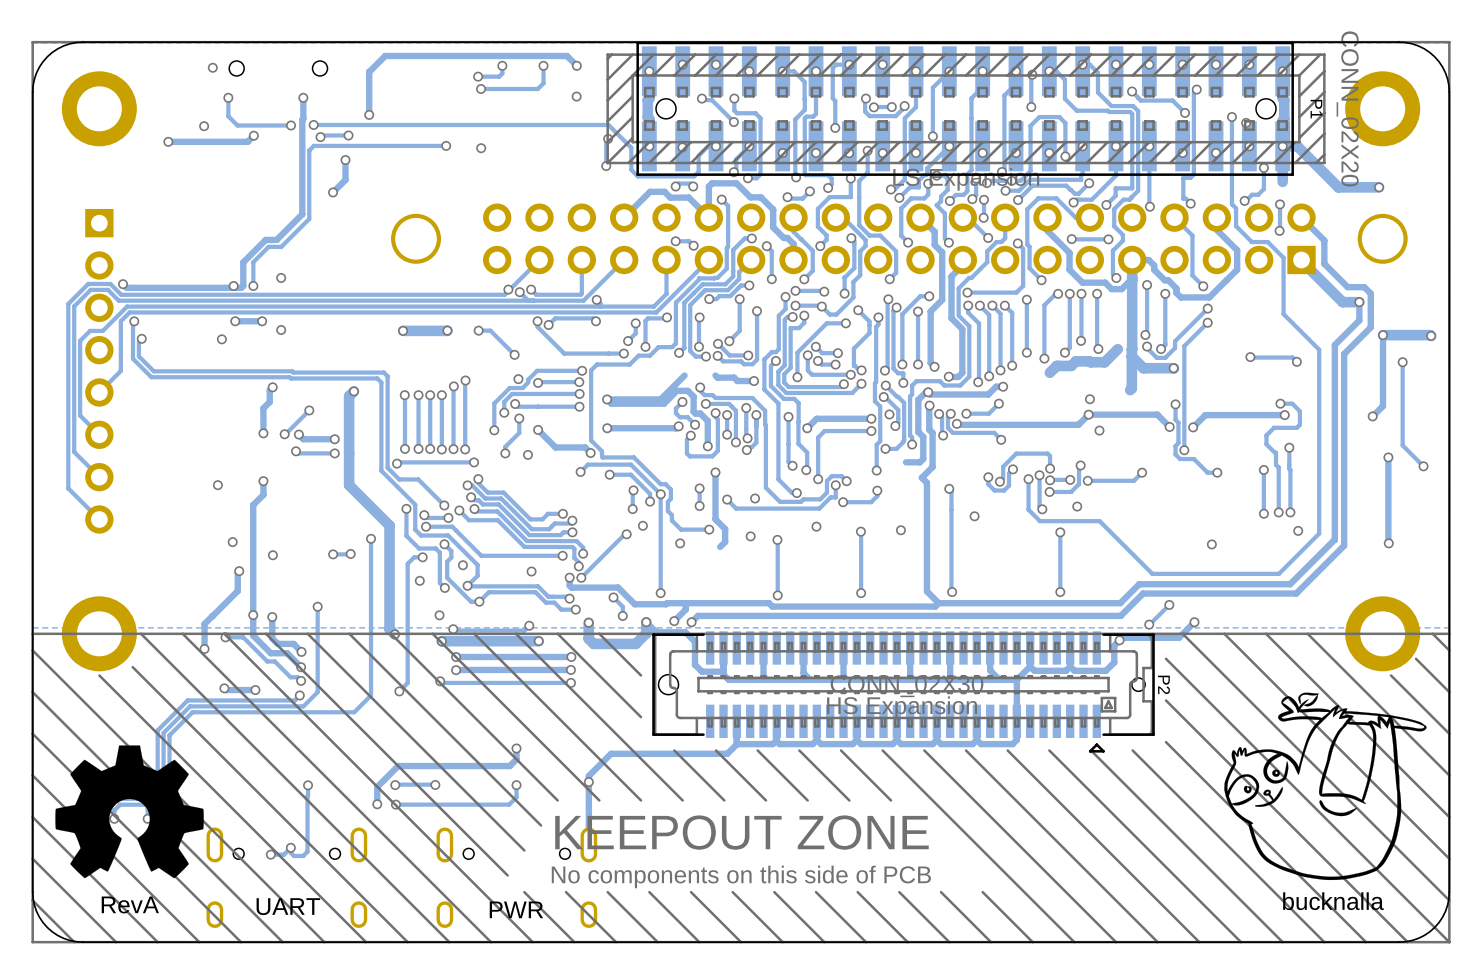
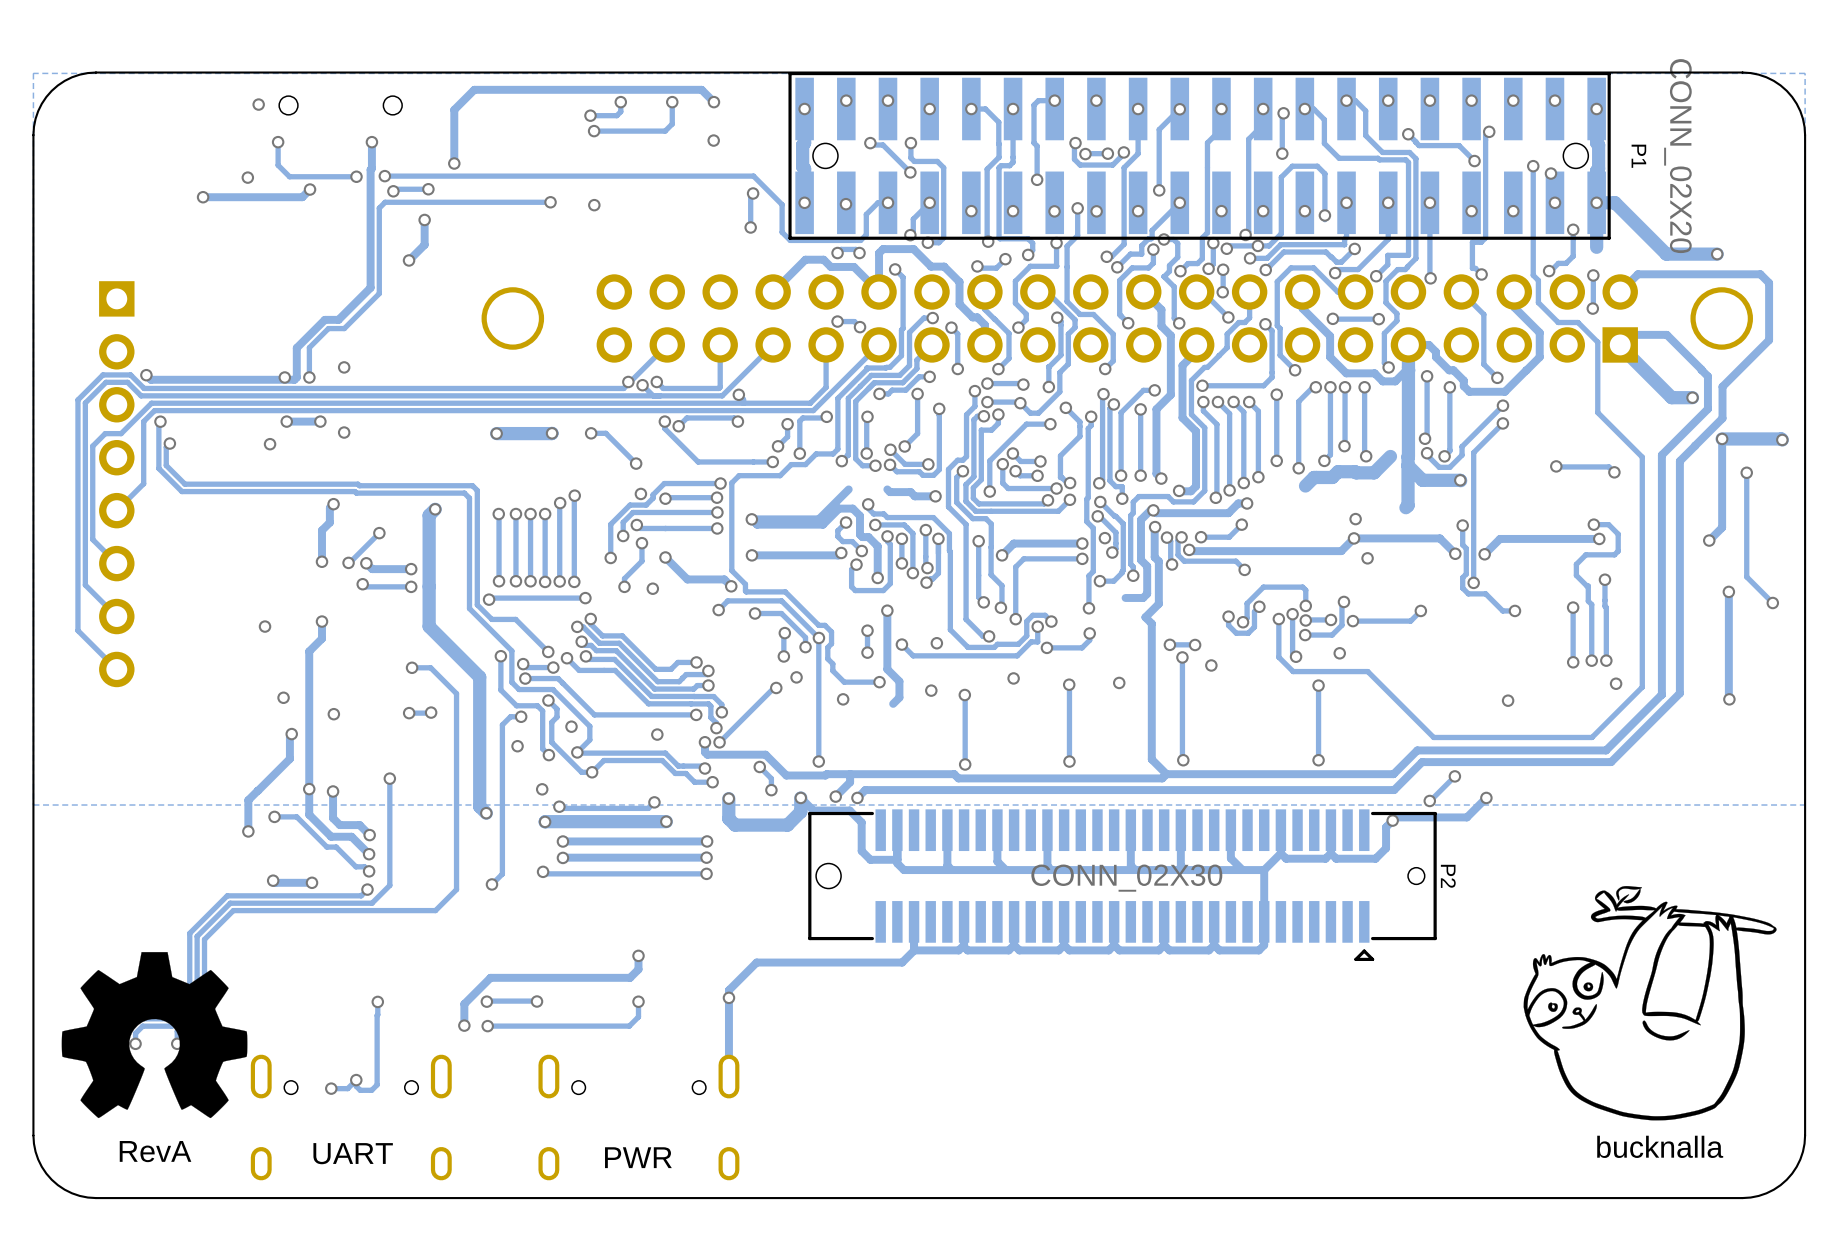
track: (1301, 217) (1324, 240) (1324, 263) (1347, 287) (1364, 287) (1370, 293) (1370, 327) (1344, 354) (1344, 545) (1294, 593) -> (1620, 292) (1637, 274) (1760, 274) (1769, 282) (1769, 340) (1722, 386) (1722, 418) (1679, 461) (1679, 693) (1611, 762)
track: (1359, 302) (1359, 320) (1334, 344) (1334, 348) -> (1630, 334) (1666, 334) (1707, 376) (1707, 408) (1661, 455)
track: (949, 488) (951, 491) (951, 509) -> none
via: (949, 488) -> none
part: (741, 492) -> none
via: none -> (1169, 644)
track: none -> (1194, 644) (1169, 644)
via: none -> (1195, 644)
via: none -> (1182, 657)
track: none -> (412, 667) (430, 667) (456, 693)
via position: (371, 538) -> (412, 667)

